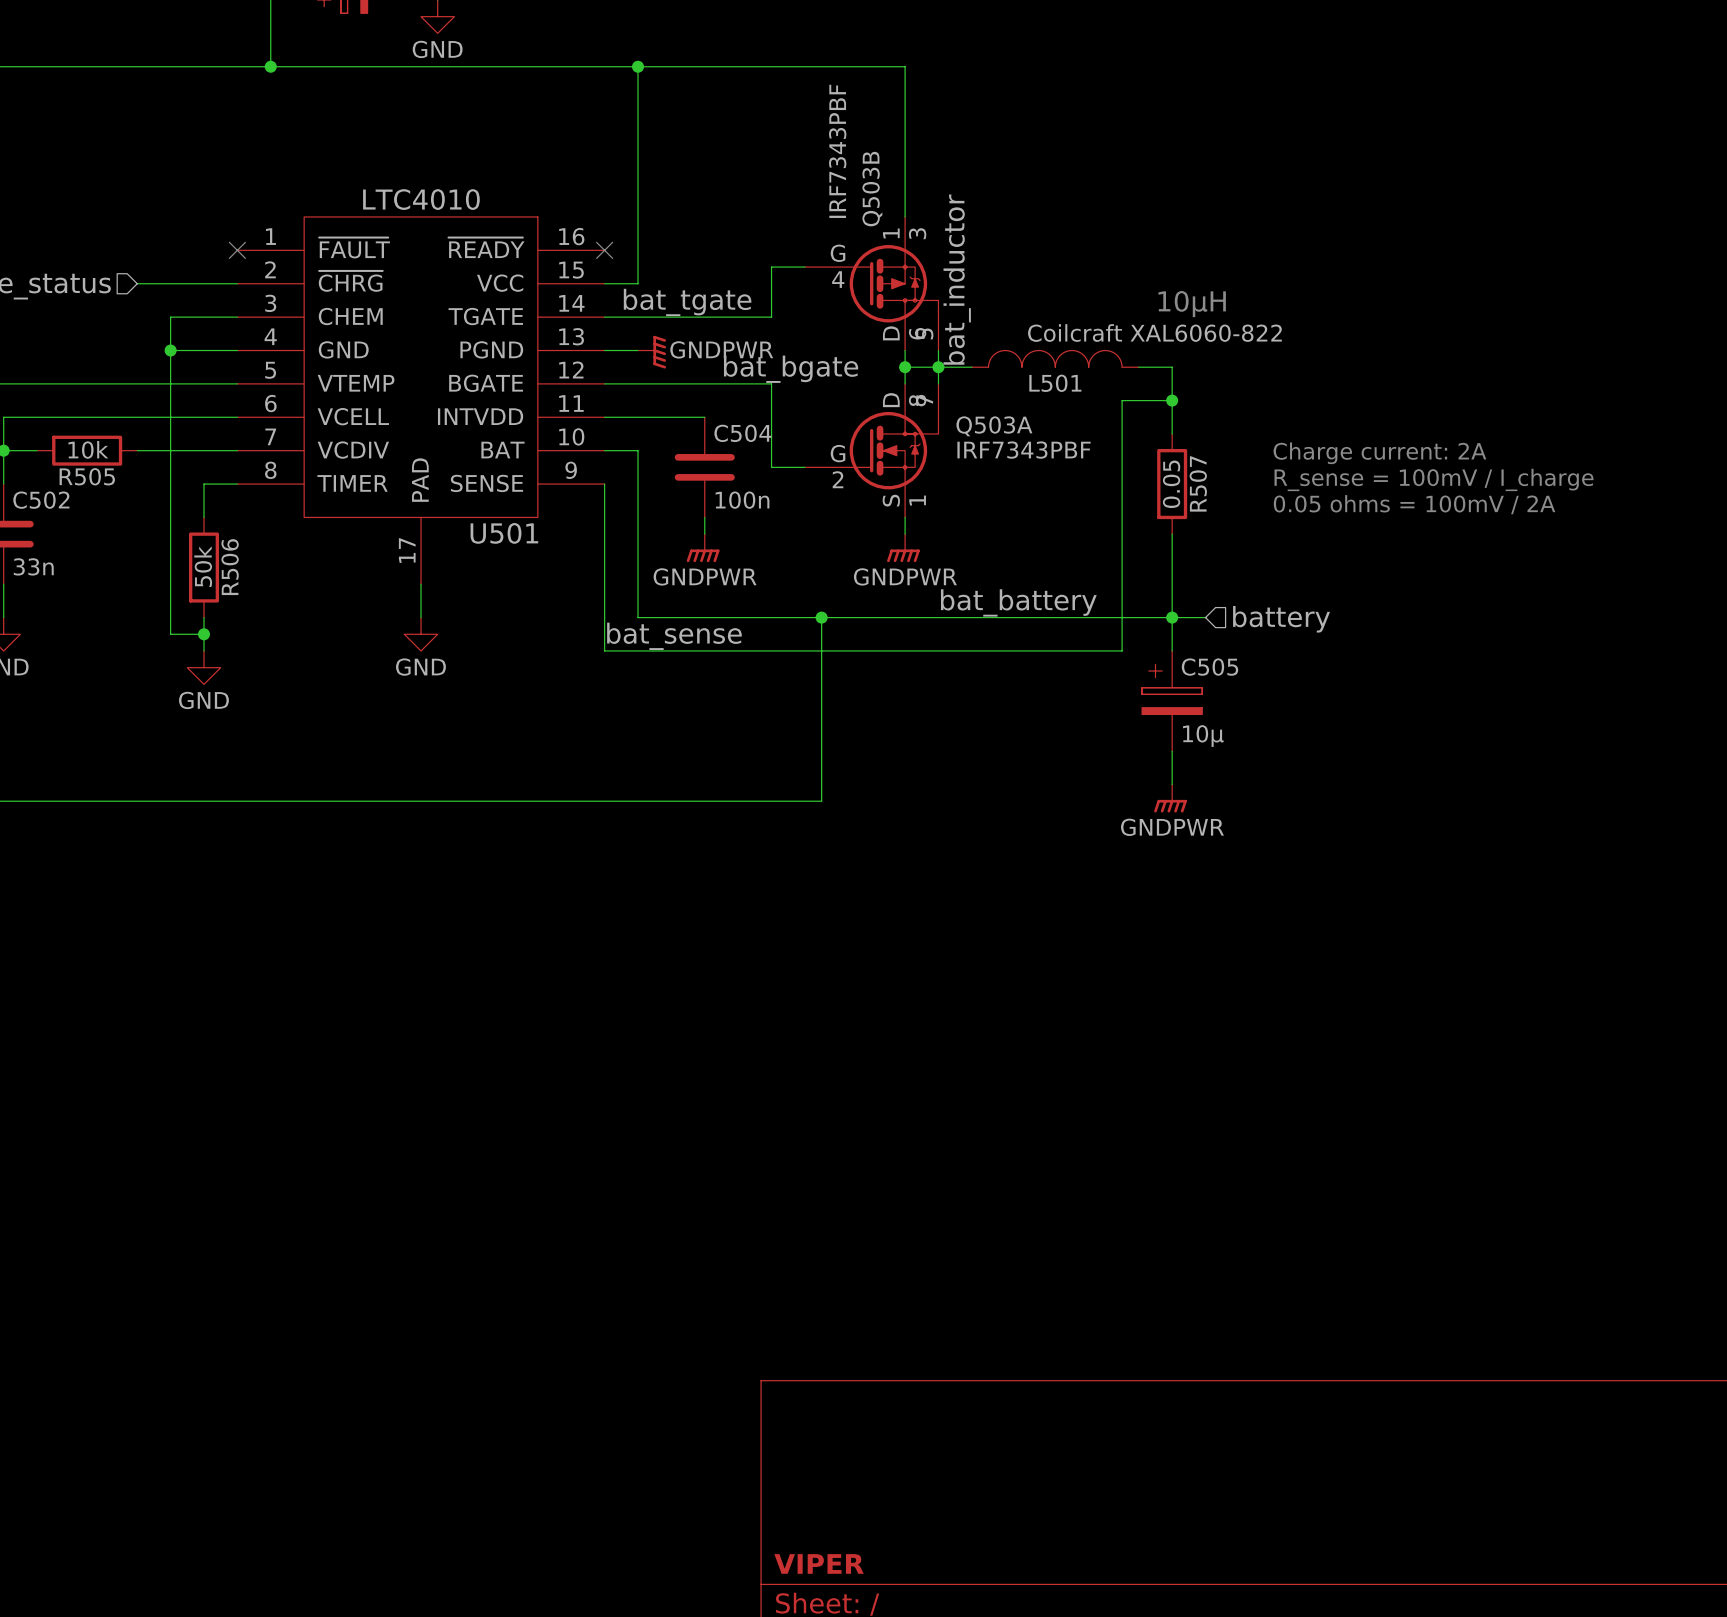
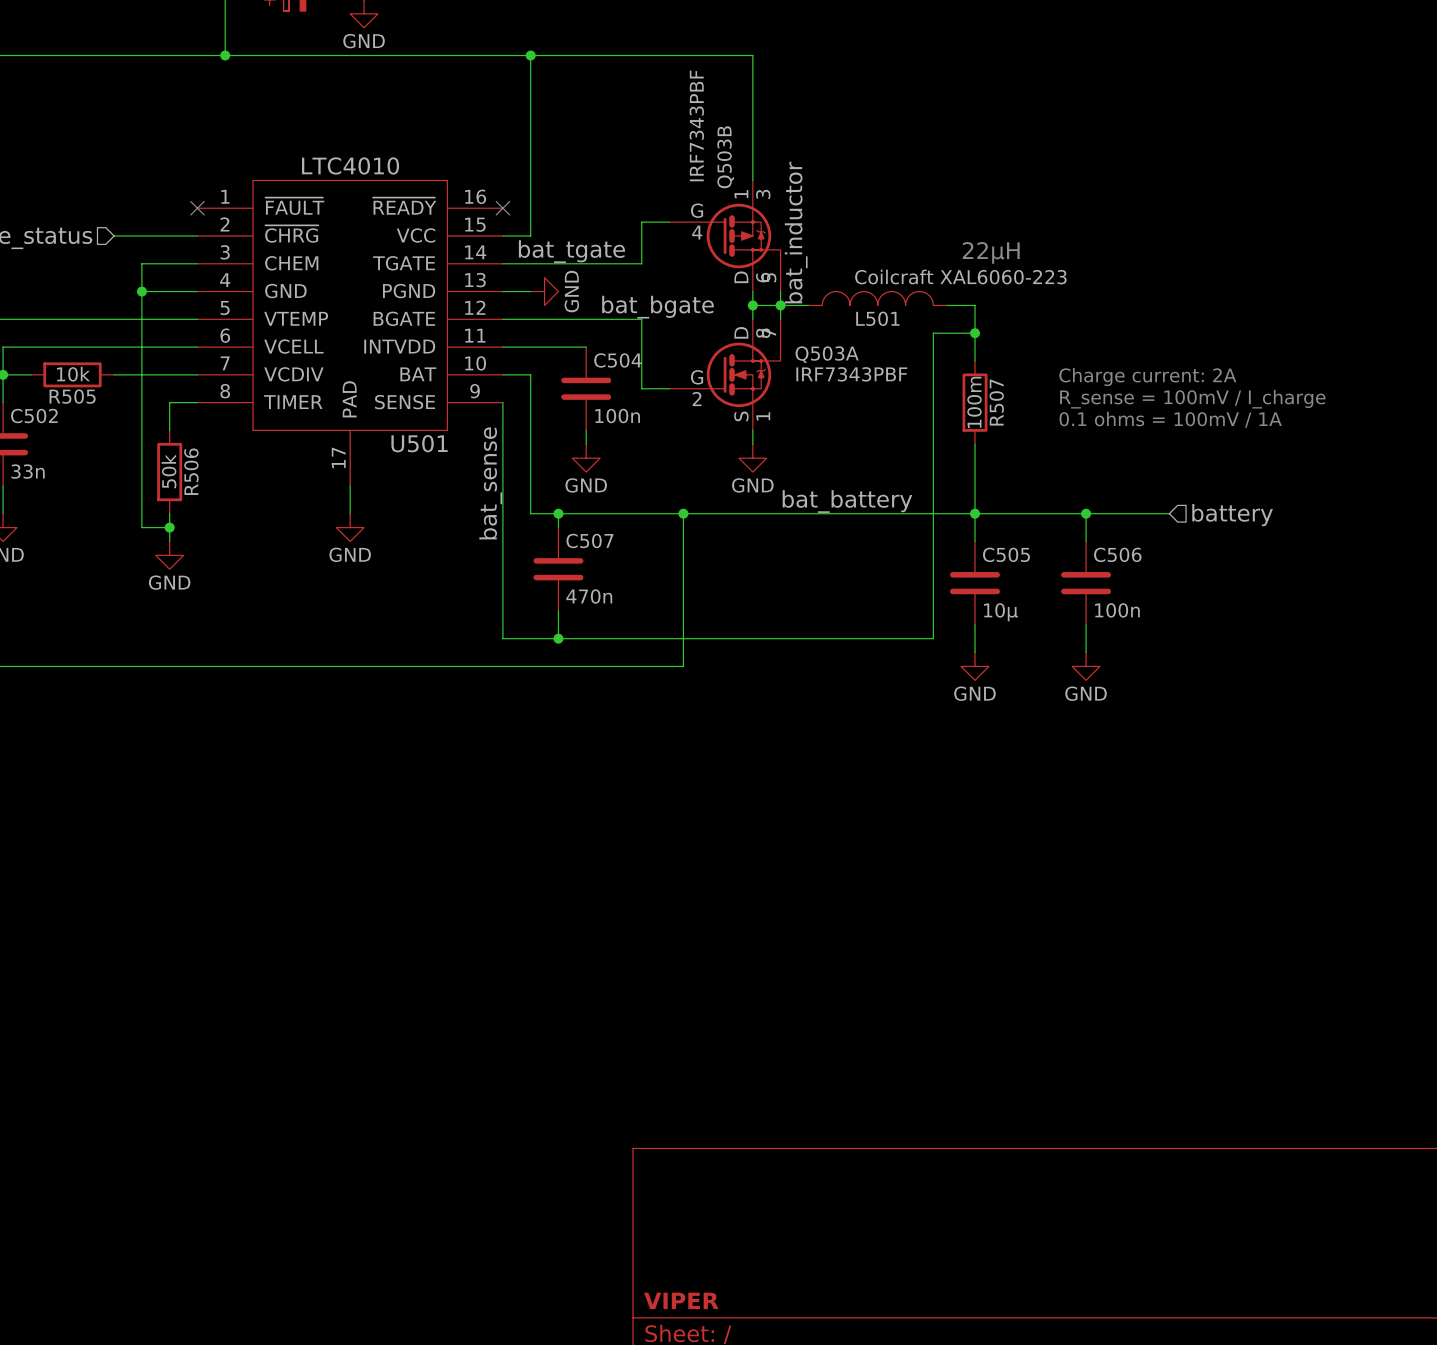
text: 10µH (1192, 304) -> 22µH (991, 252)
L501 value: Coilcraft XAL6060-822 (1154, 333) -> Coilcraft XAL6060-223 (960, 276)
power symbol: GNDPWR (652, 352) -> GND (544, 291)
R507 value: 0.05 (1171, 484) -> 100m (974, 402)
text: 0.05 ohms = 100mV / 2A (1414, 504) -> 0.1 ohms = 100mV / 1A (1170, 419)
power symbol: GNDPWR (703, 548) -> GND (586, 458)
power symbol: GNDPWR (903, 548) -> GND (752, 458)
wire: none -> (558, 513) (558, 527)
junction: none -> (558, 513)
wire: none -> (1002, 513) (1169, 513)
wire: none -> (1086, 513) (1086, 541)
junction: none -> (1086, 513)
hierarchical label position: battery (1281, 619) -> battery (1232, 515)
label rotation: 0° (674, 636) -> 90° counterclockwise (490, 483)
wire: (604, 650) (1122, 650) -> (502, 541) (502, 638) (933, 638) (933, 541)
C505 symbol: [1142, 650, 1203, 752] -> [950, 541, 1000, 625]
C507: none -> 470n (558, 569)
C506: none -> 100n (1086, 583)
wire: none -> (558, 610) (558, 638)
wire: none -> (1086, 624) (1086, 652)
junction: none -> (558, 638)
power symbol: GNDPWR (1170, 798) -> GND (975, 666)
power symbol: none -> GND (1086, 666)

